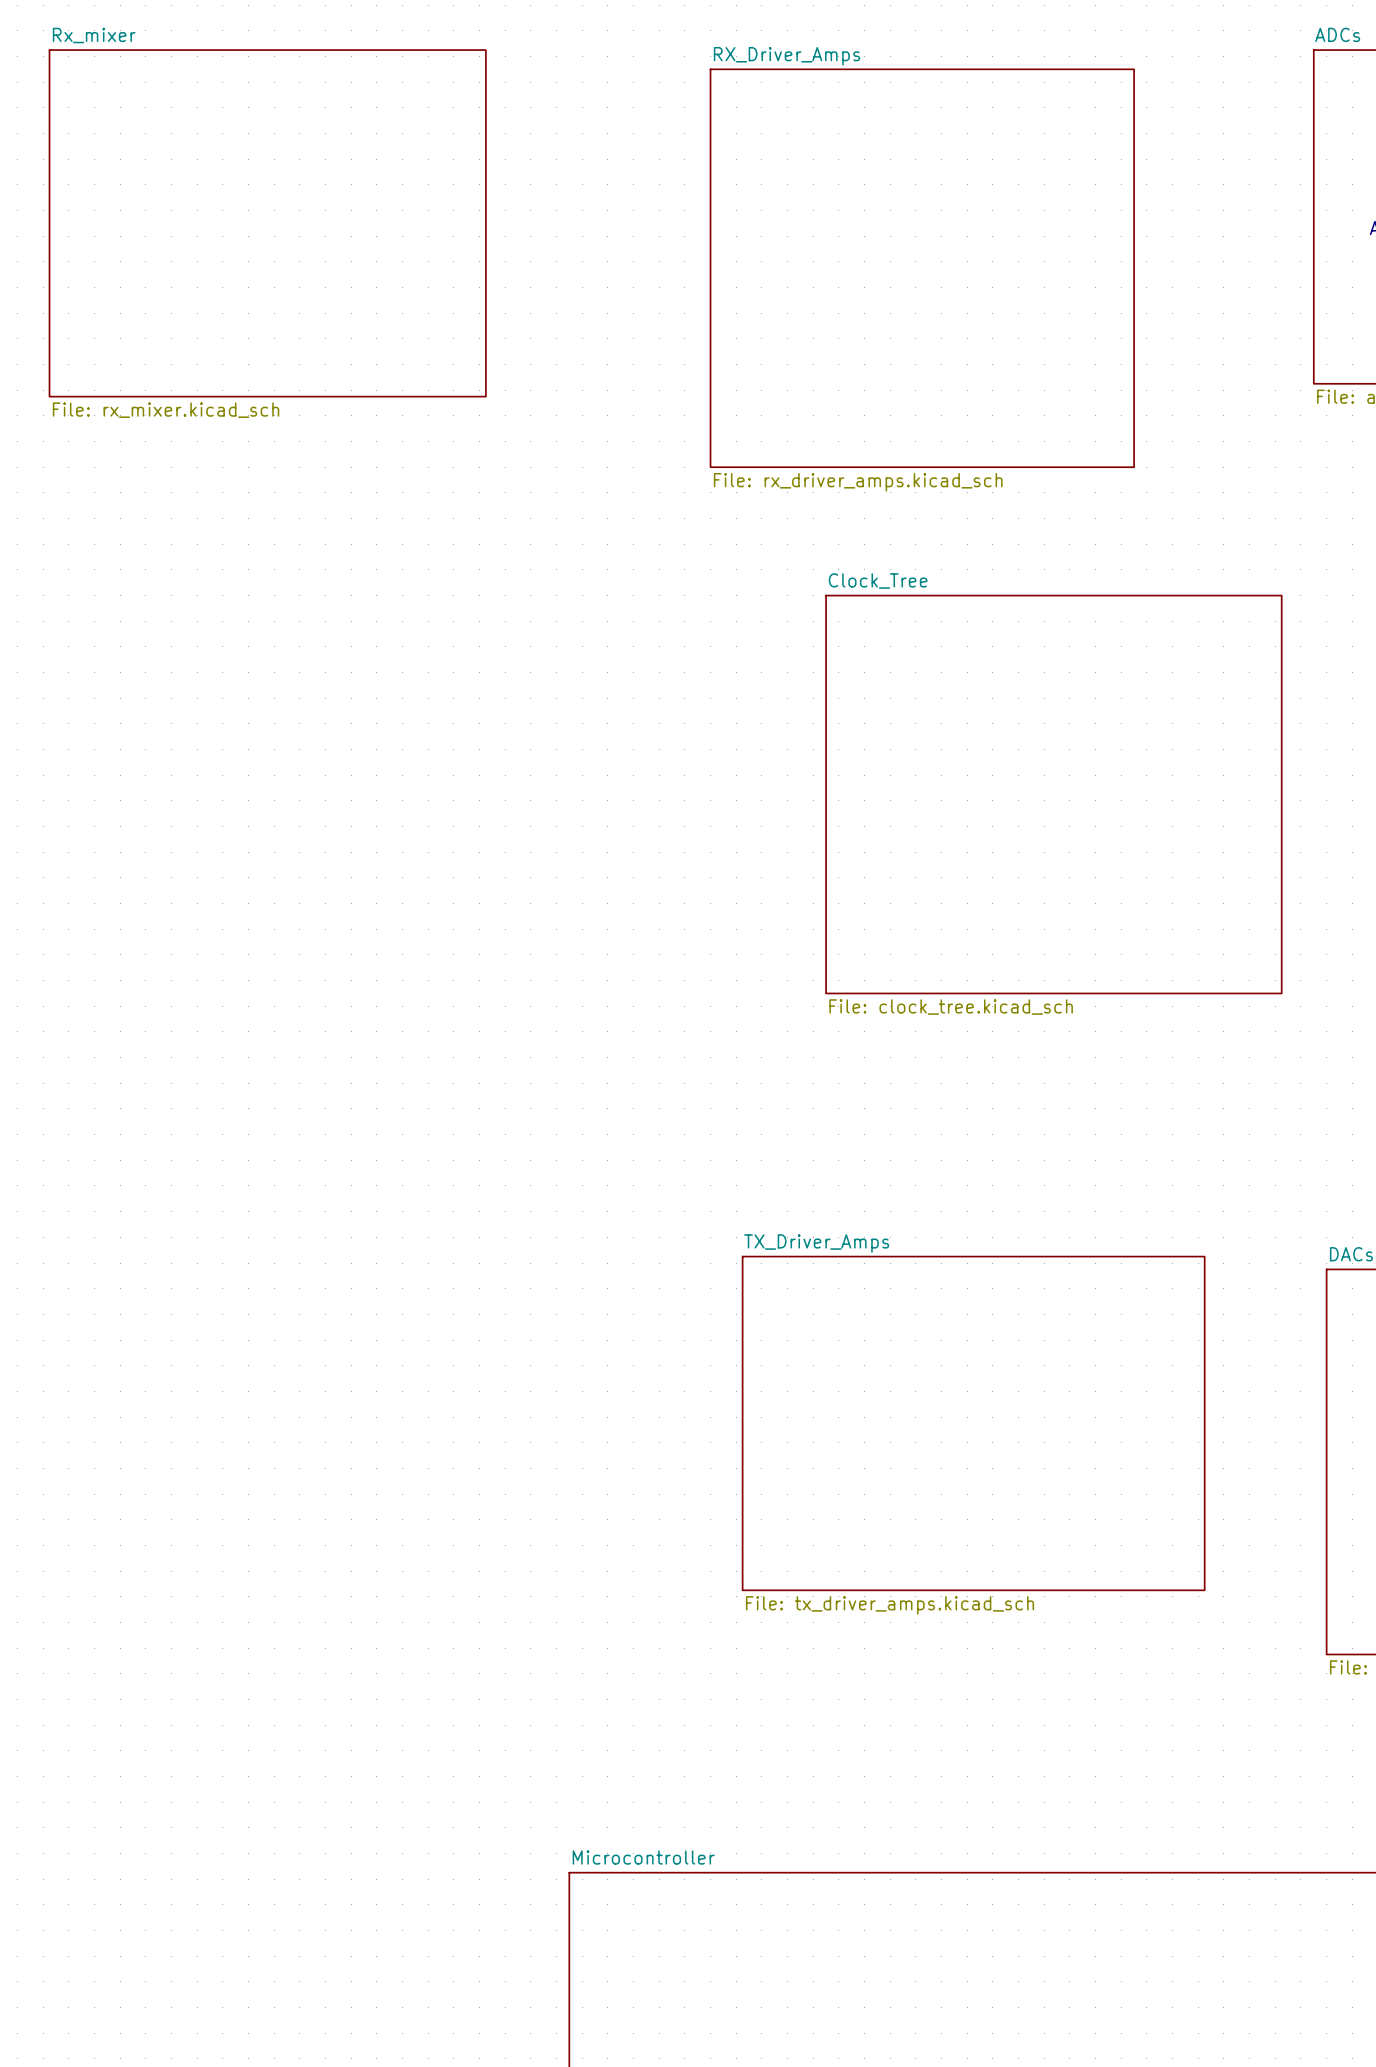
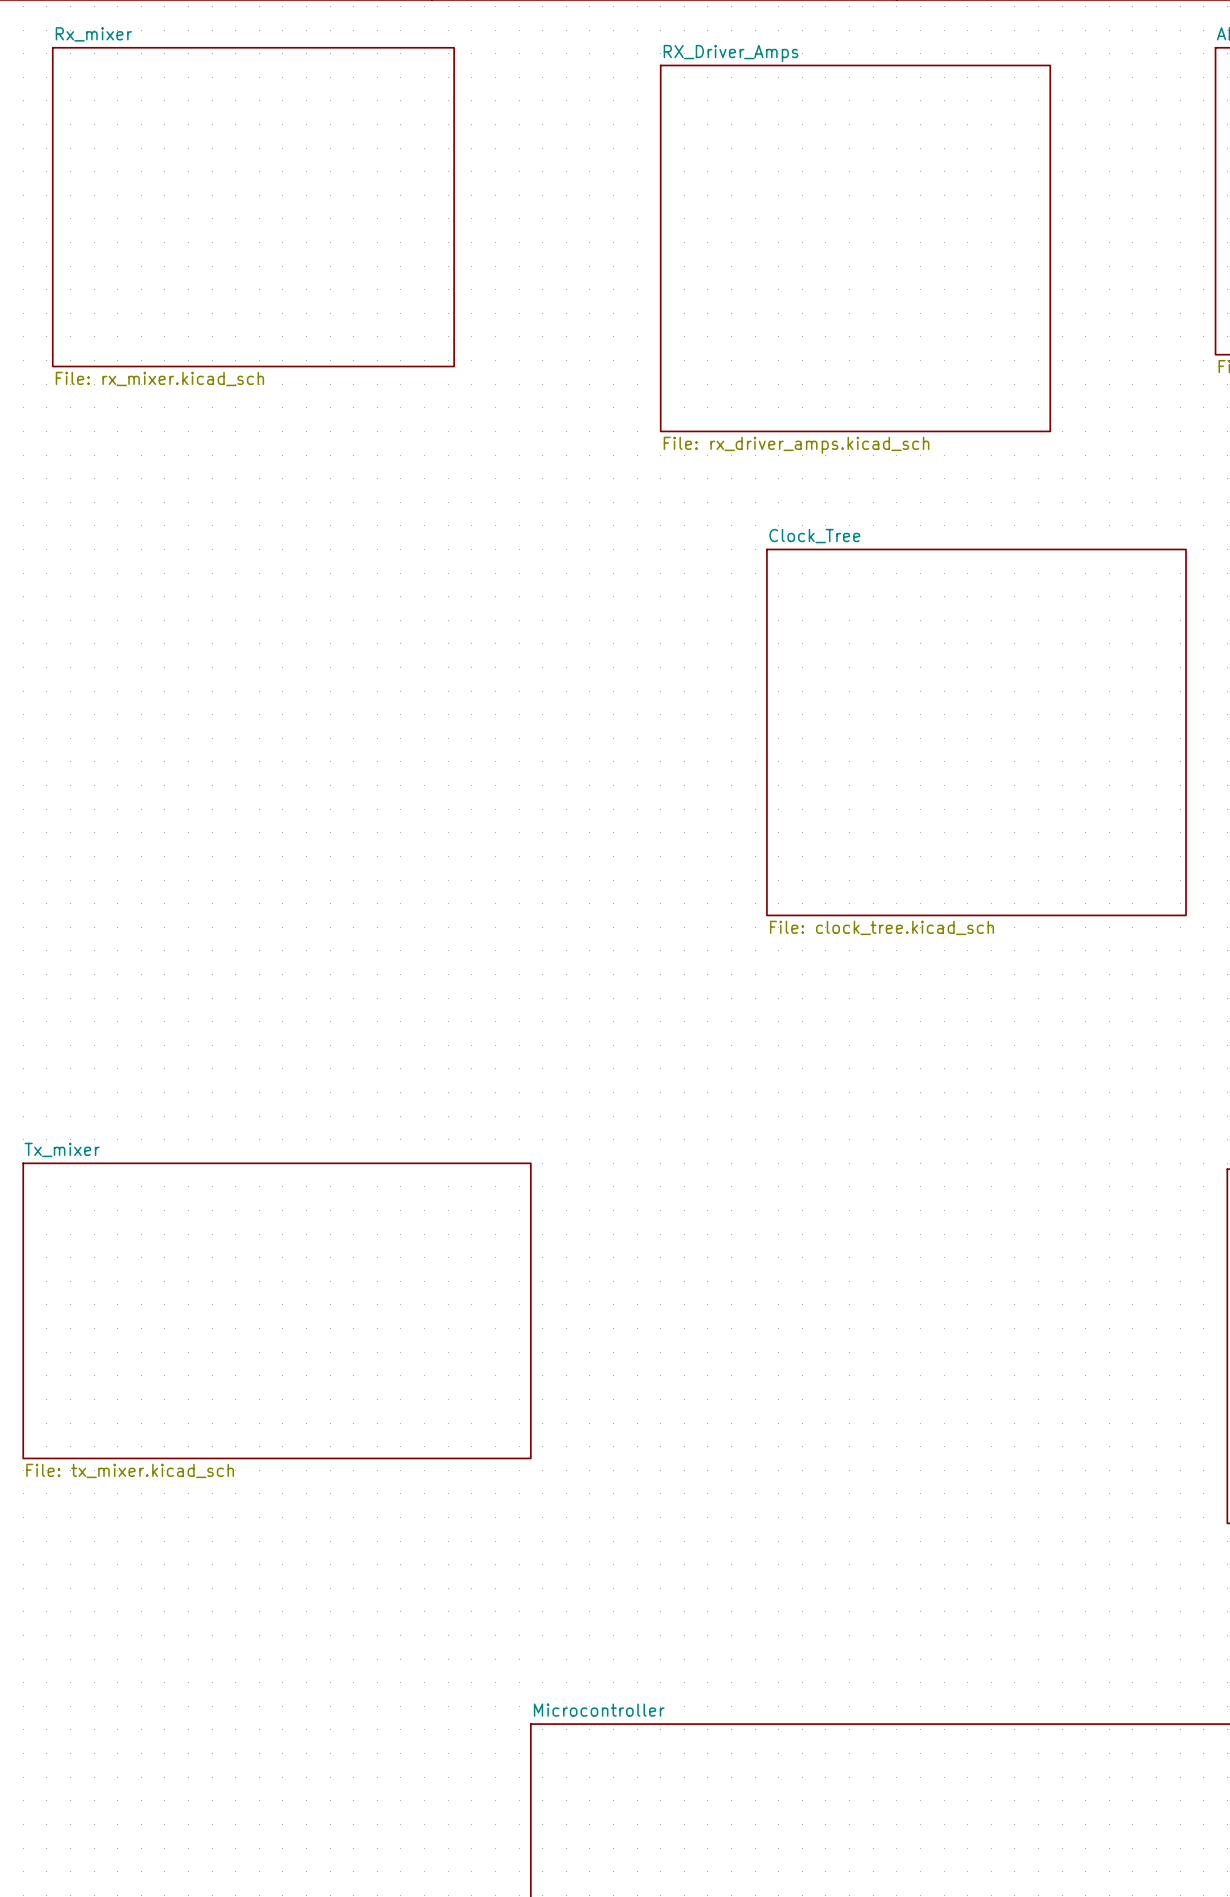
sheet Tx_mixer: none -> File: tx_mixer.kicad_sch (277, 1310)
sheet TX_Driver_Amps: File: tx_driver_amps.kicad_sch (973, 1423) -> none

